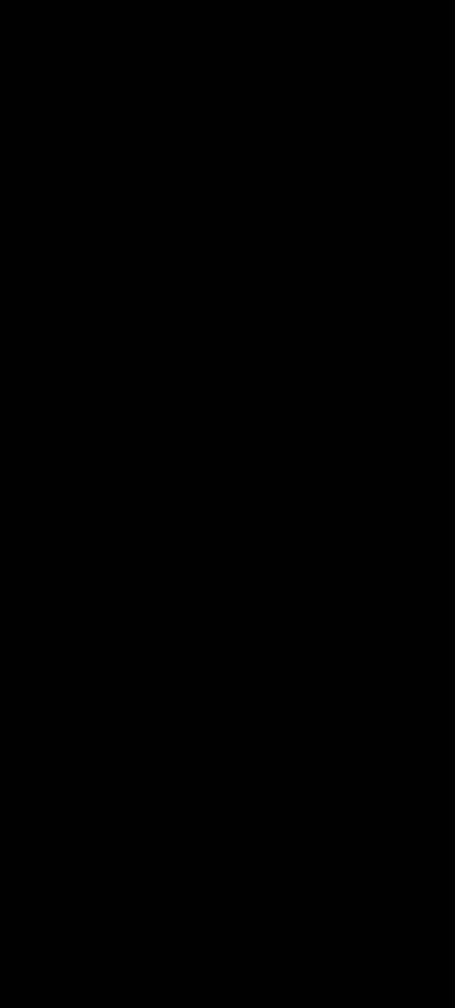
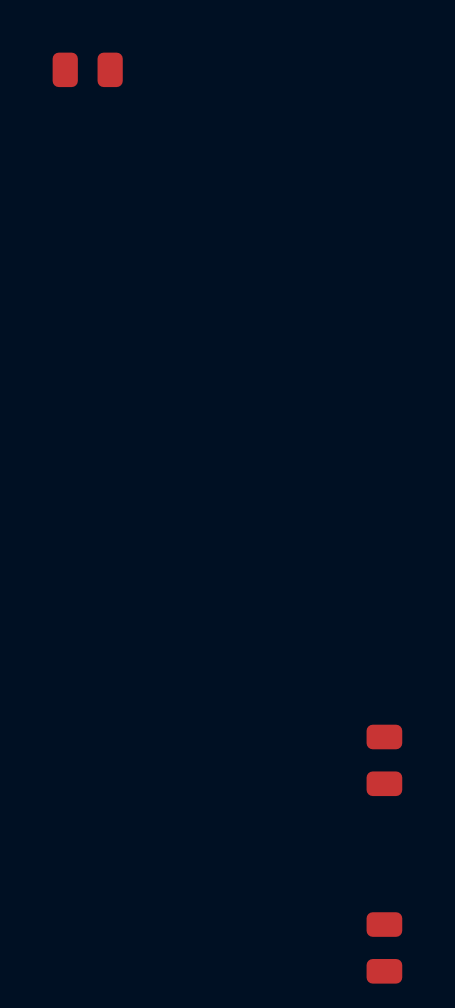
part: none -> (87, 69)
part: none -> (384, 760)
part: none -> (384, 947)

